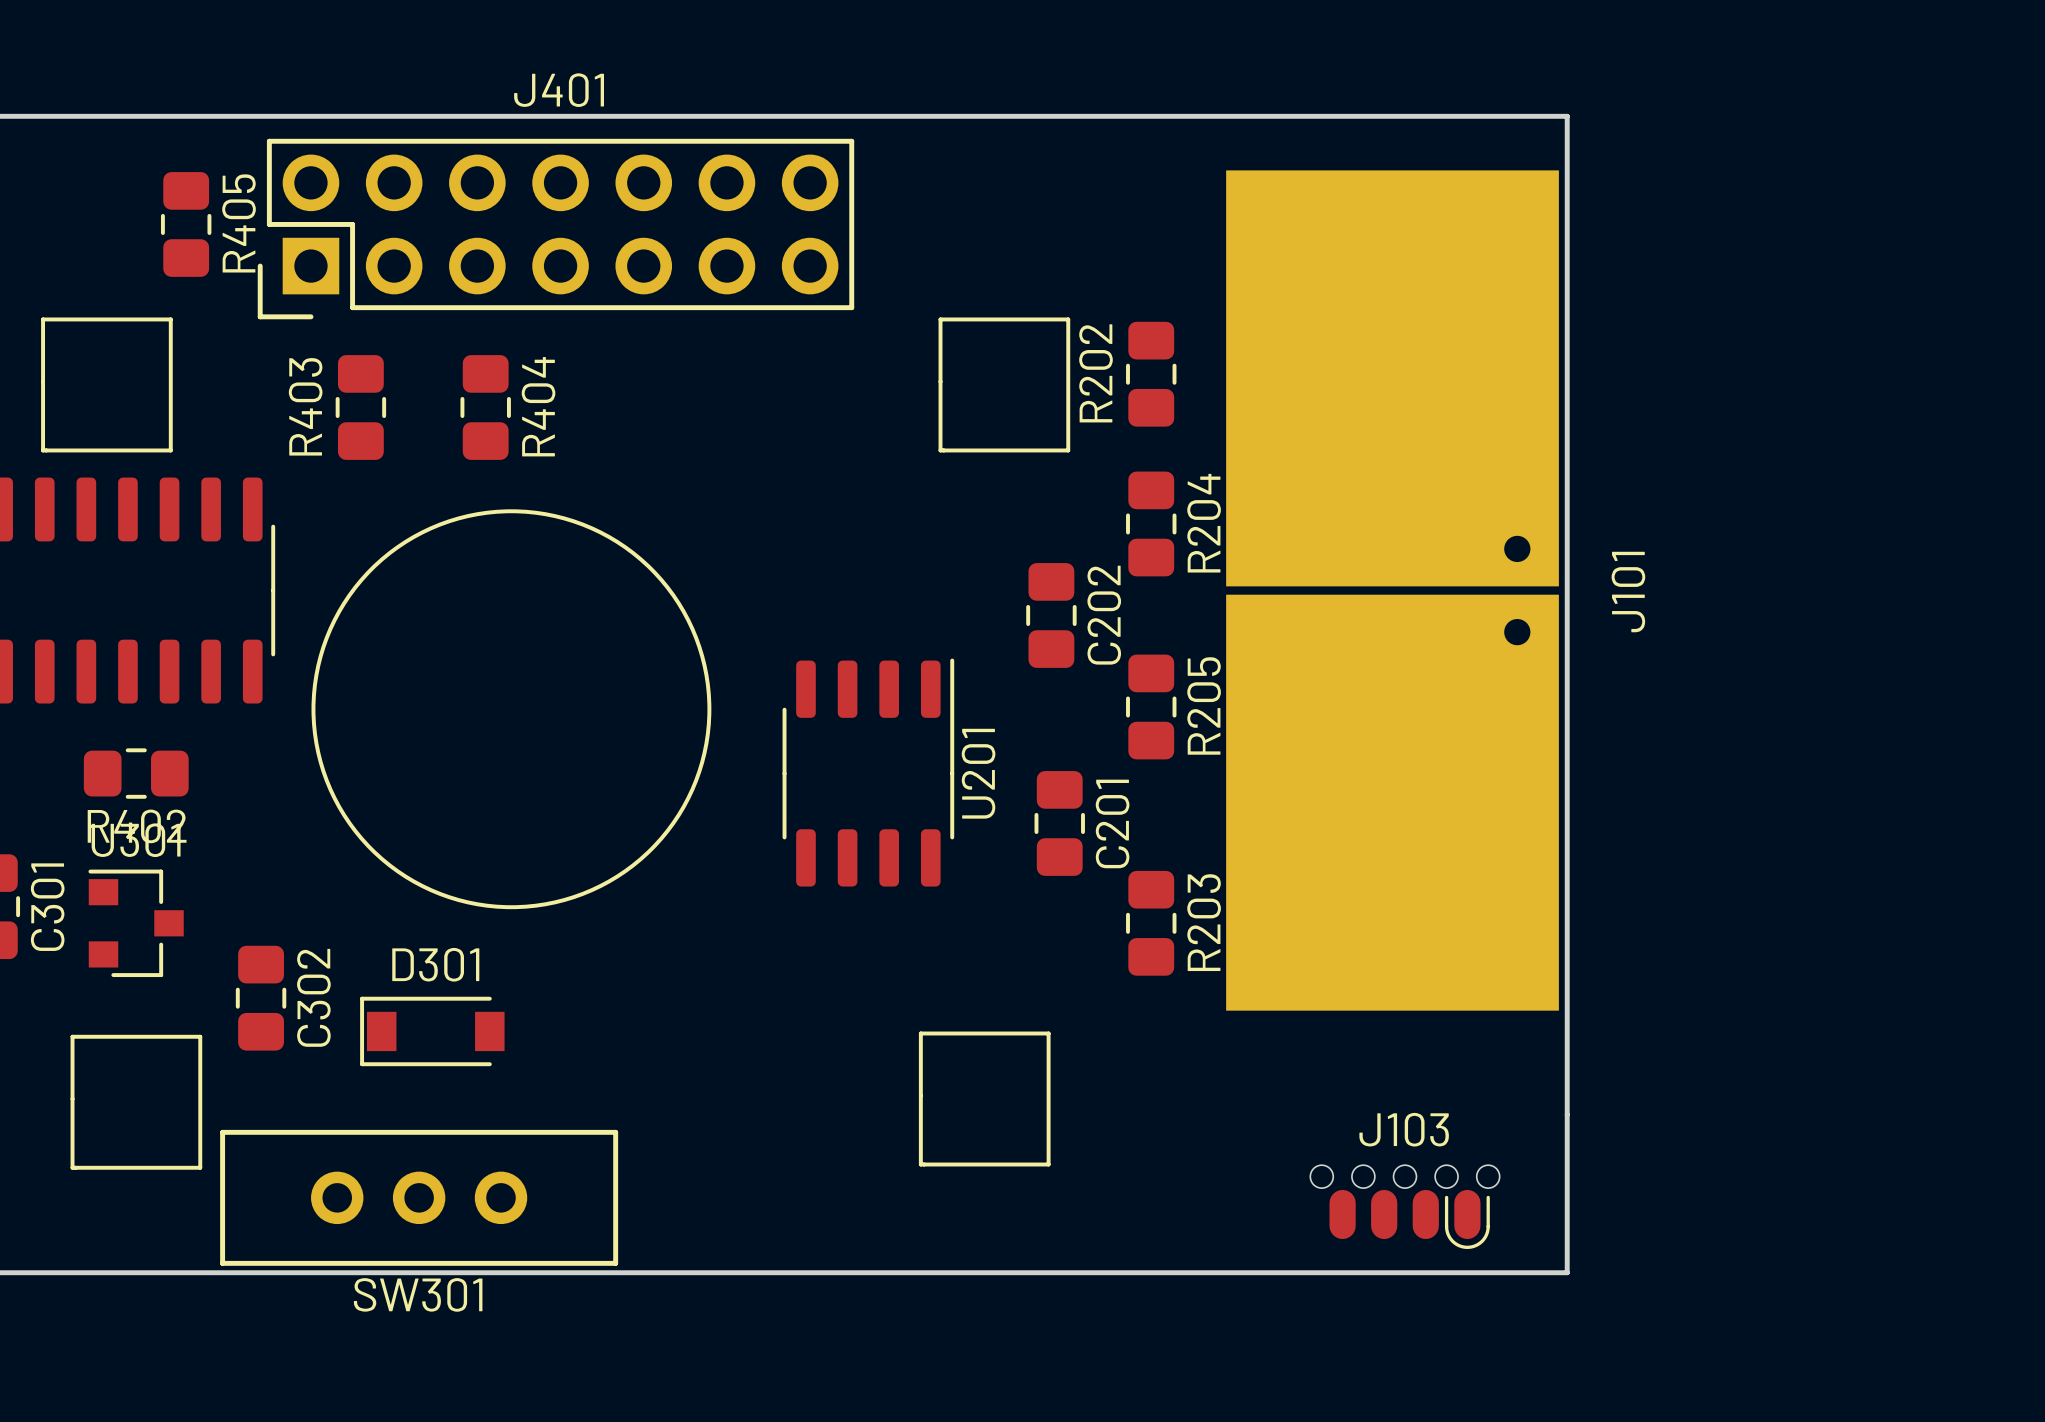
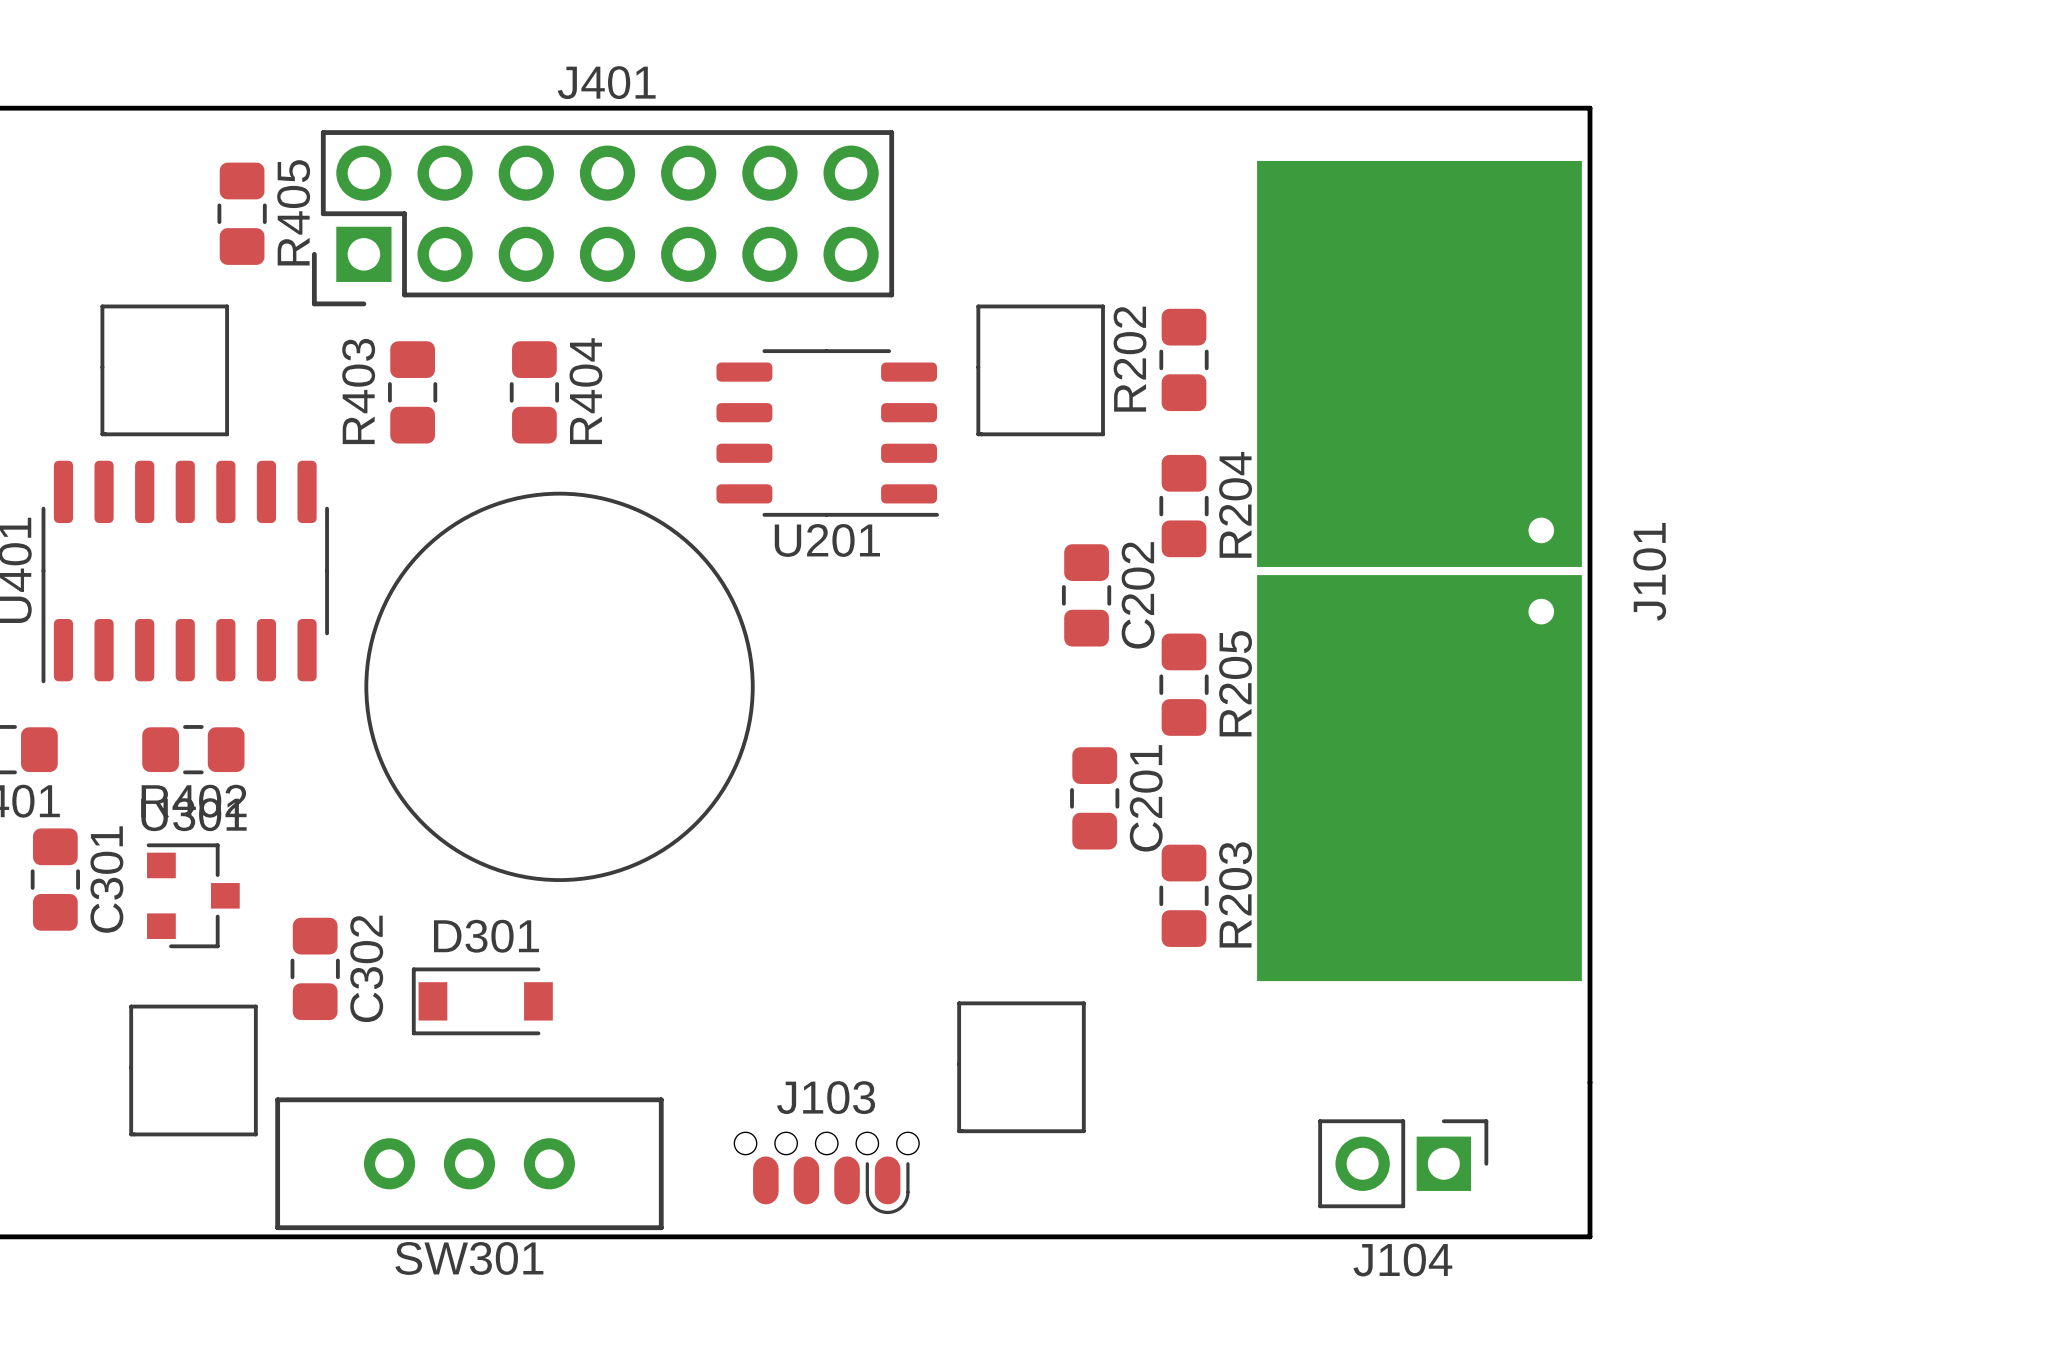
U201 rotation: 0° (868, 772) -> 90° clockwise (827, 432)
U201 position: (868, 772) -> (827, 432)
J104: none -> (1403, 1163)
J103 position: (1404, 1207) -> (826, 1173)

